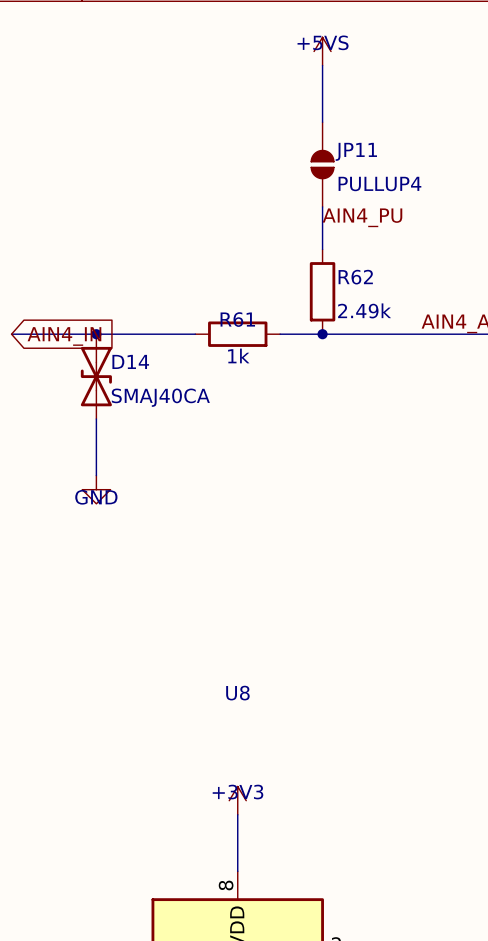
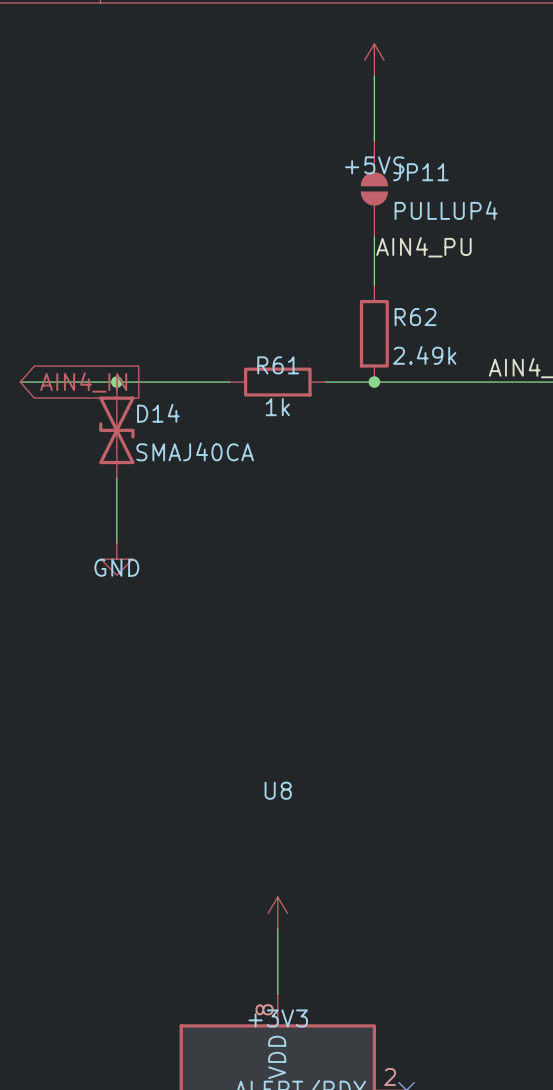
power symbol text position: +5VS (323, 42) -> +5VS (374, 165)
power symbol text position: +3V3 (237, 792) -> +3V3 (278, 1018)

